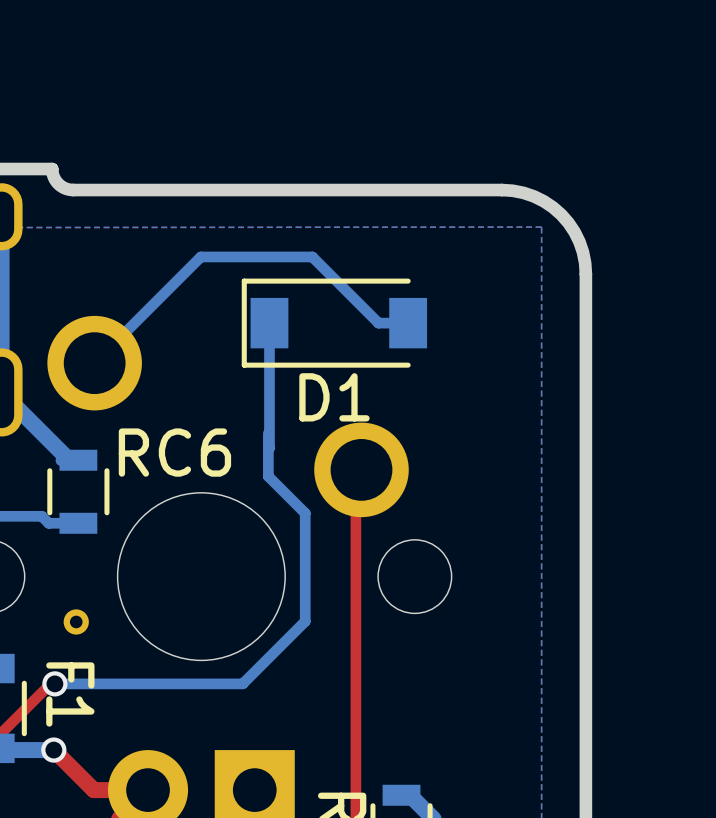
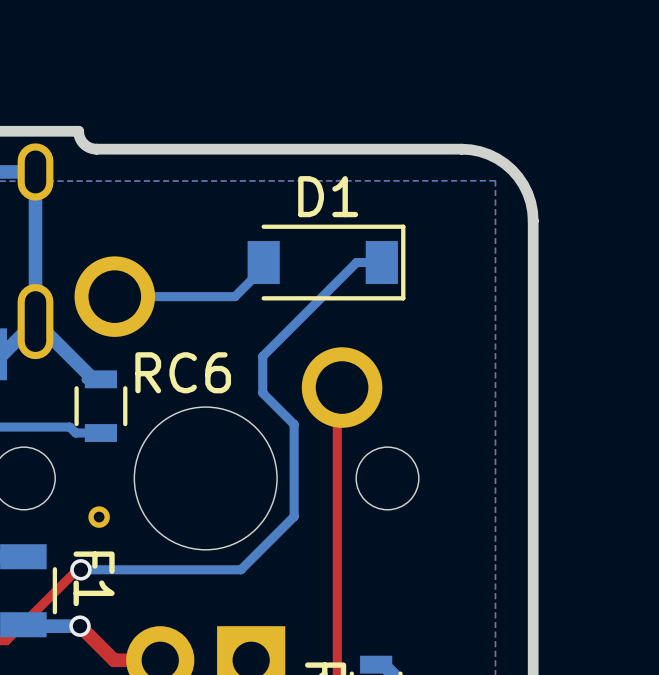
D1 rotation: 0° (334, 323) -> 180° (326, 262)
bottom track: (378, 323) (312, 256) (200, 256) (94, 363) -> (263, 267) (234, 296) (114, 296)
bottom track: none -> (356, 262) (262, 356)
bottom track: (269, 329) (268, 449) -> none

